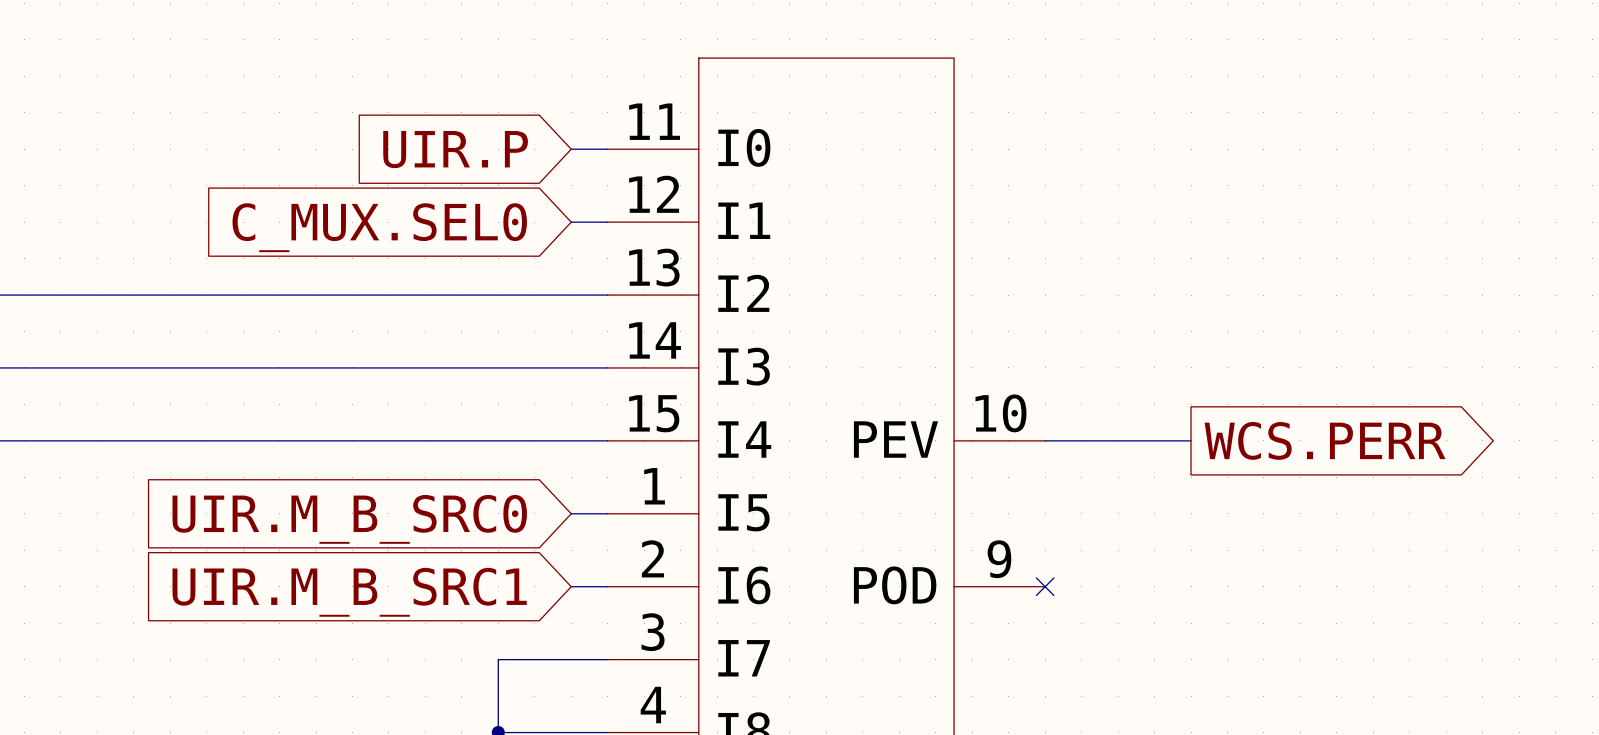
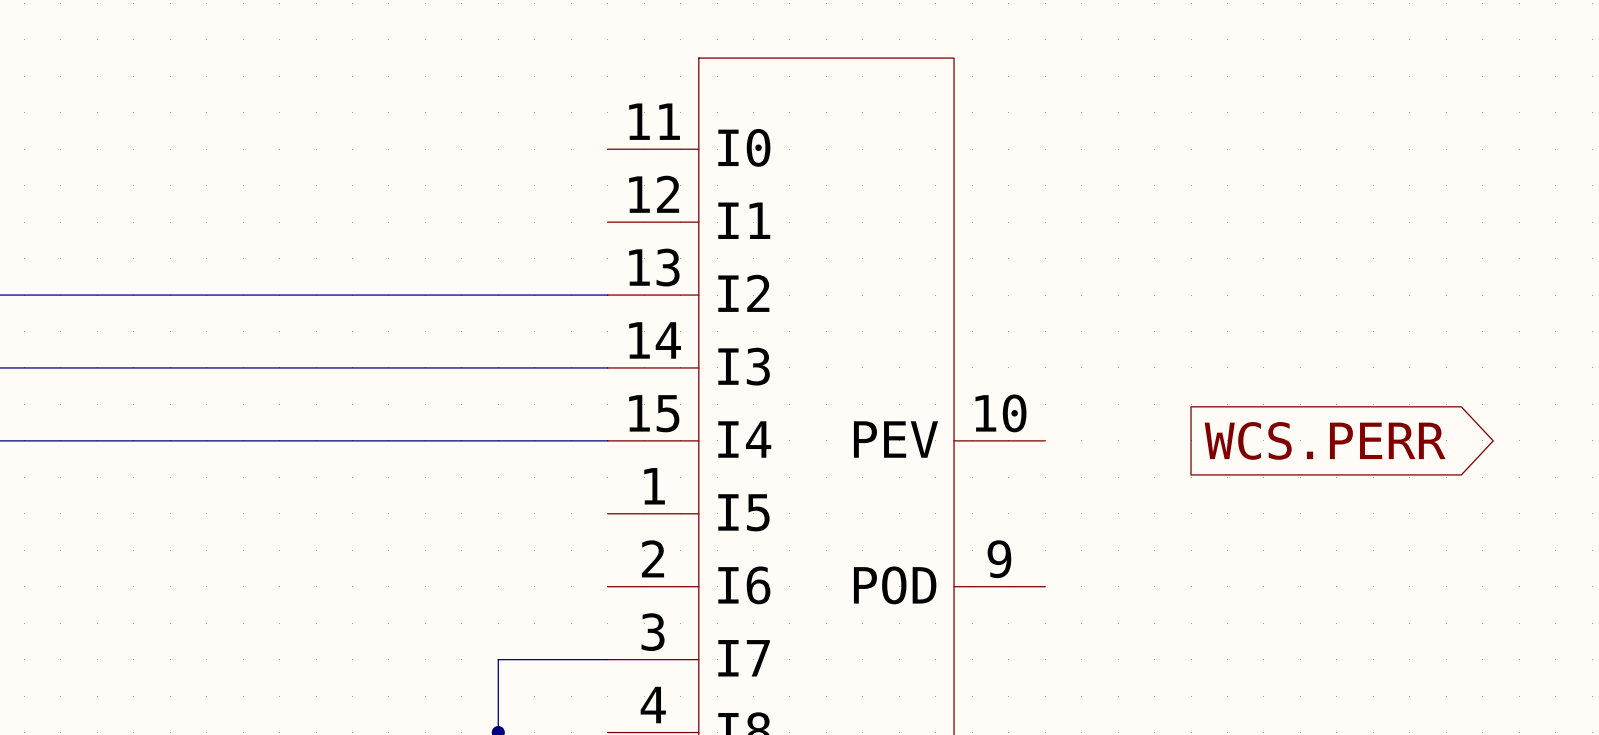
global label: UIR.P (455, 149) -> none
wire: (571, 149) (607, 149) -> none
wire: (571, 222) (607, 222) -> none
global label: C_MUX.SEL0 (379, 227) -> none
wire: (1045, 440) (1191, 440) -> none
wire: (571, 513) (607, 513) -> none
global label: UIR.M_B_SRC0 (349, 519) -> none
wire: (571, 586) (607, 586) -> none
no-connect mark: (1045, 586) -> none
global label: UIR.M_B_SRC1 (349, 592) -> none
wire: (498, 732) (607, 732) -> none

